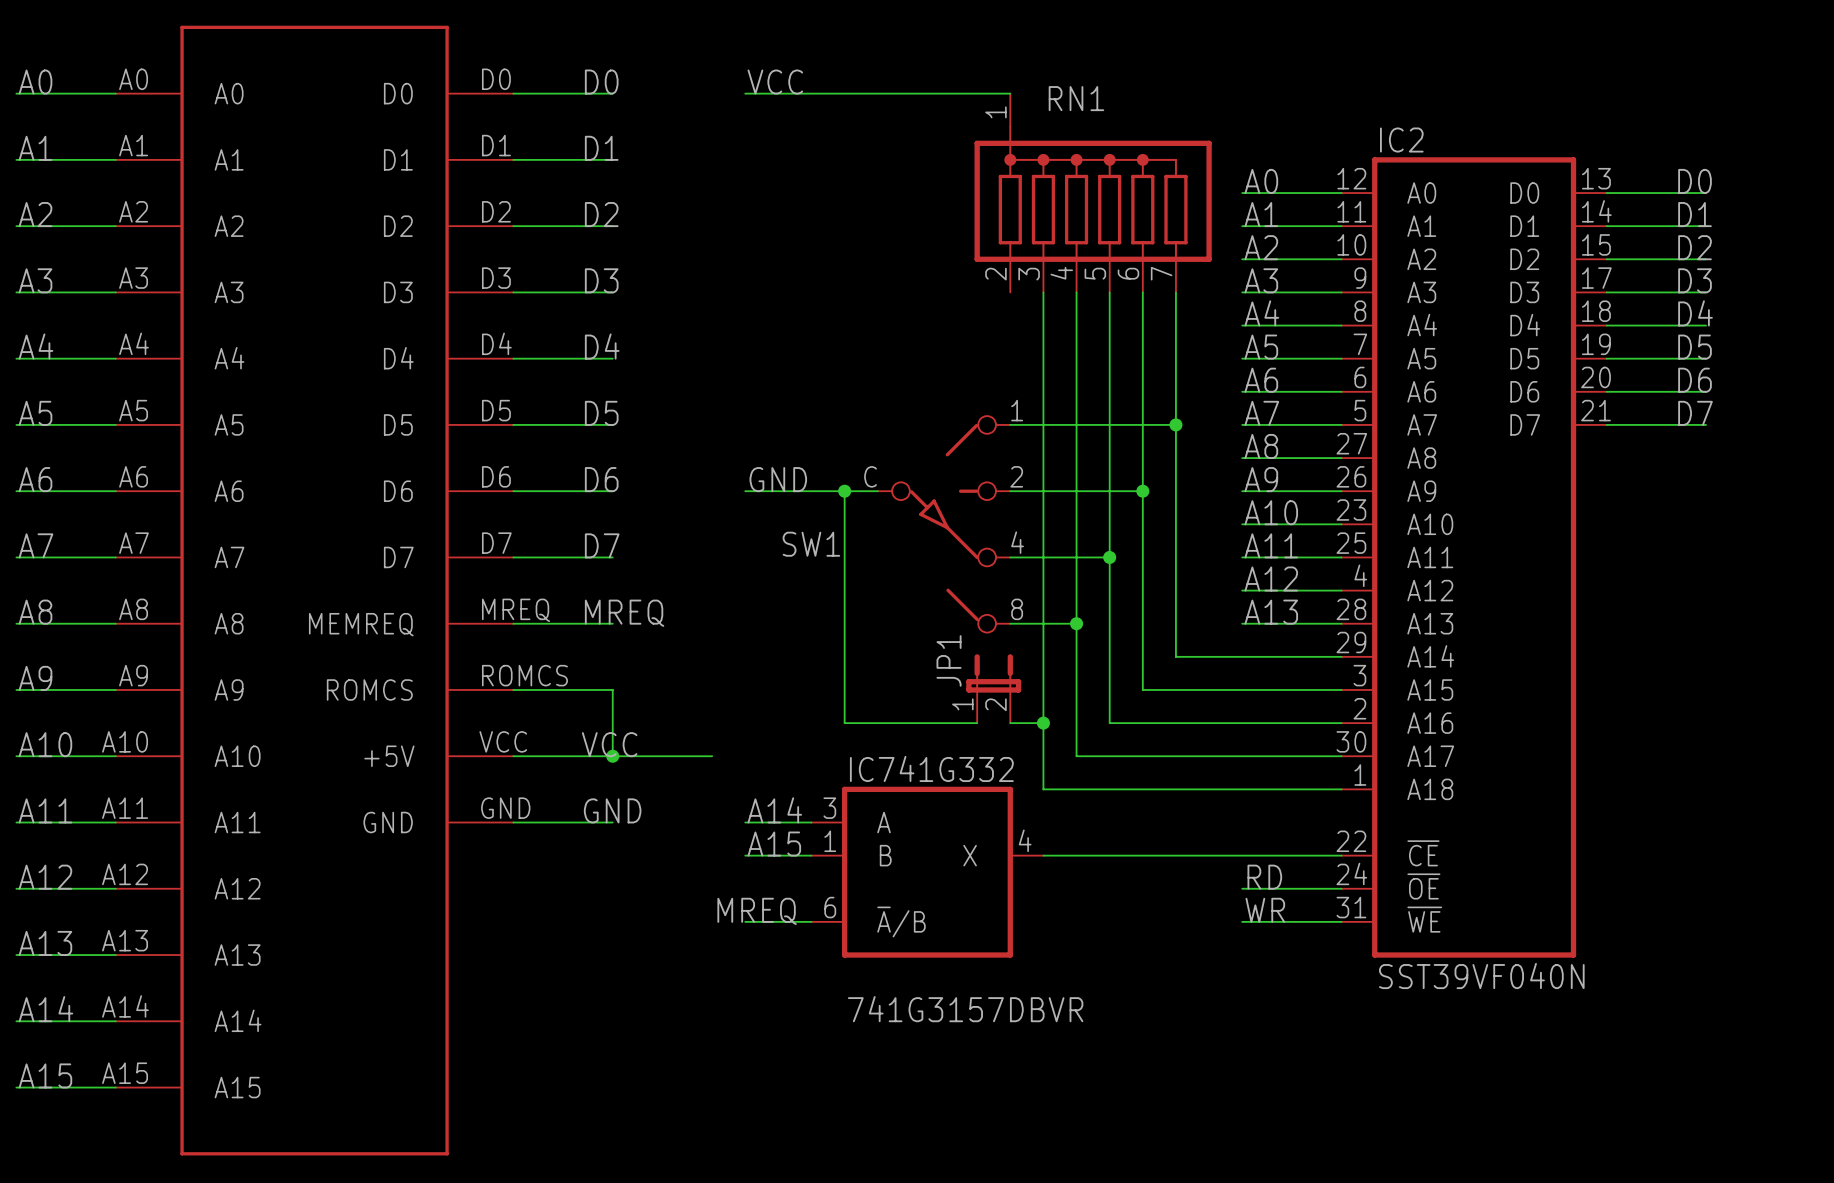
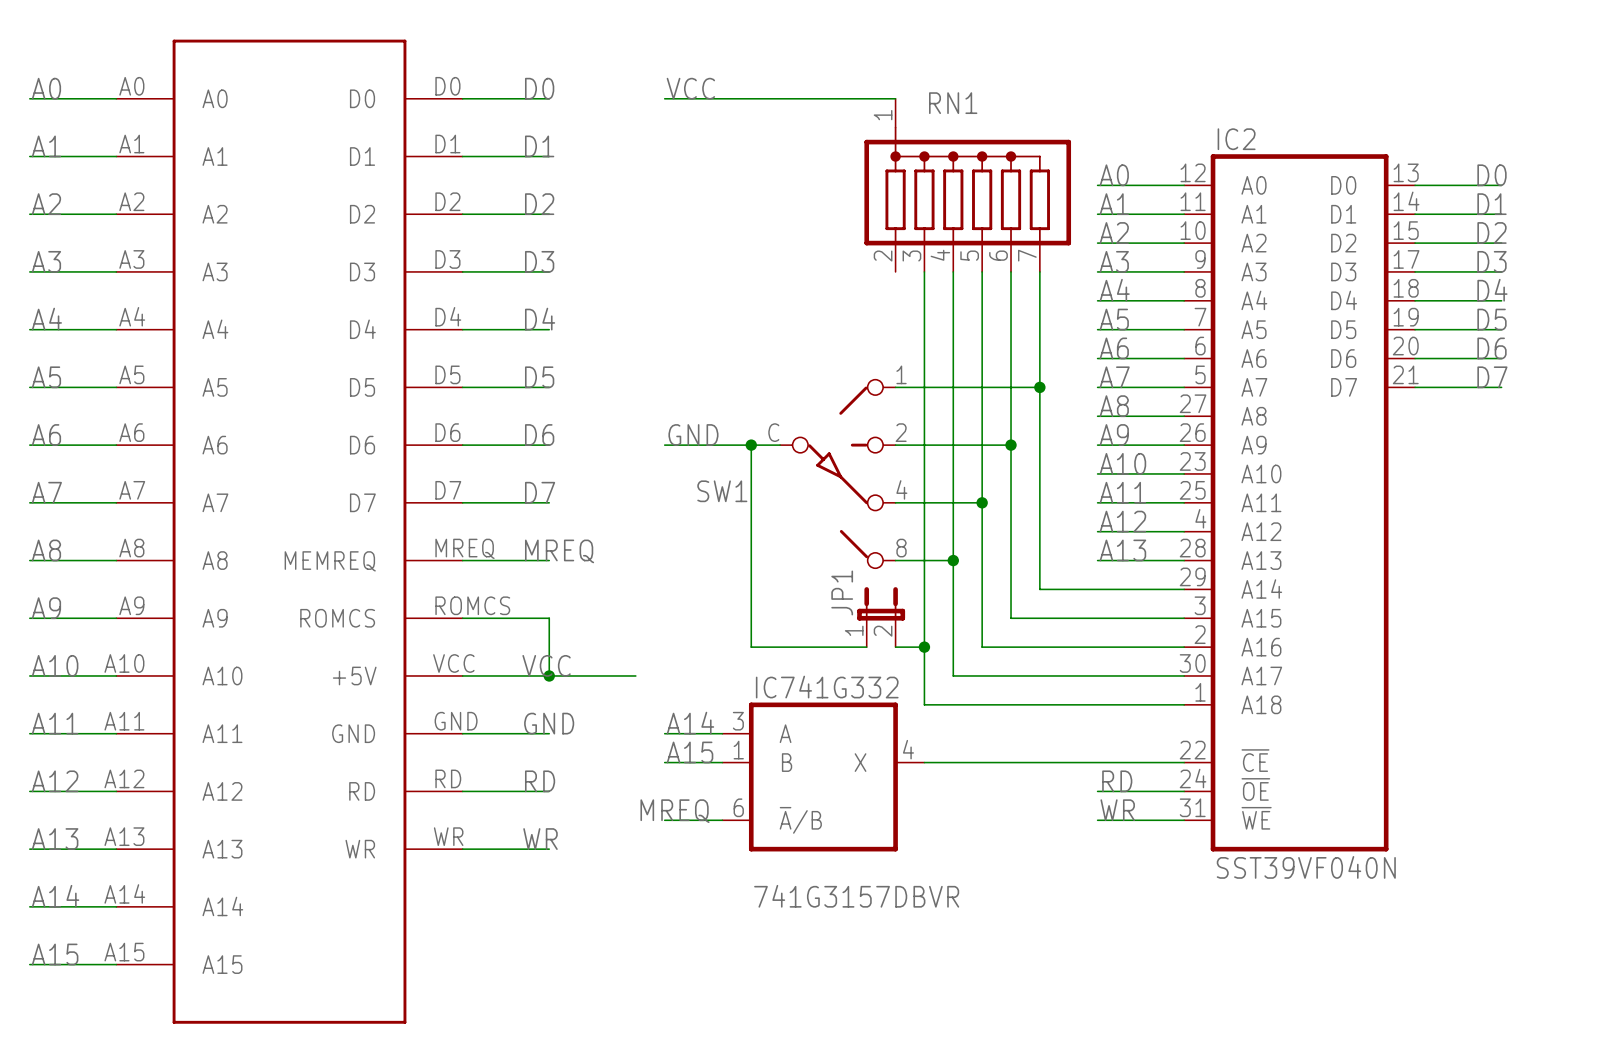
part symbol: [115, 25, 514, 1156] -> [116, 39, 463, 1024]
label: none -> RD (540, 781)
wire: none -> (462, 791) (549, 791)
label: none -> WR (540, 839)
wire: none -> (462, 849) (549, 849)

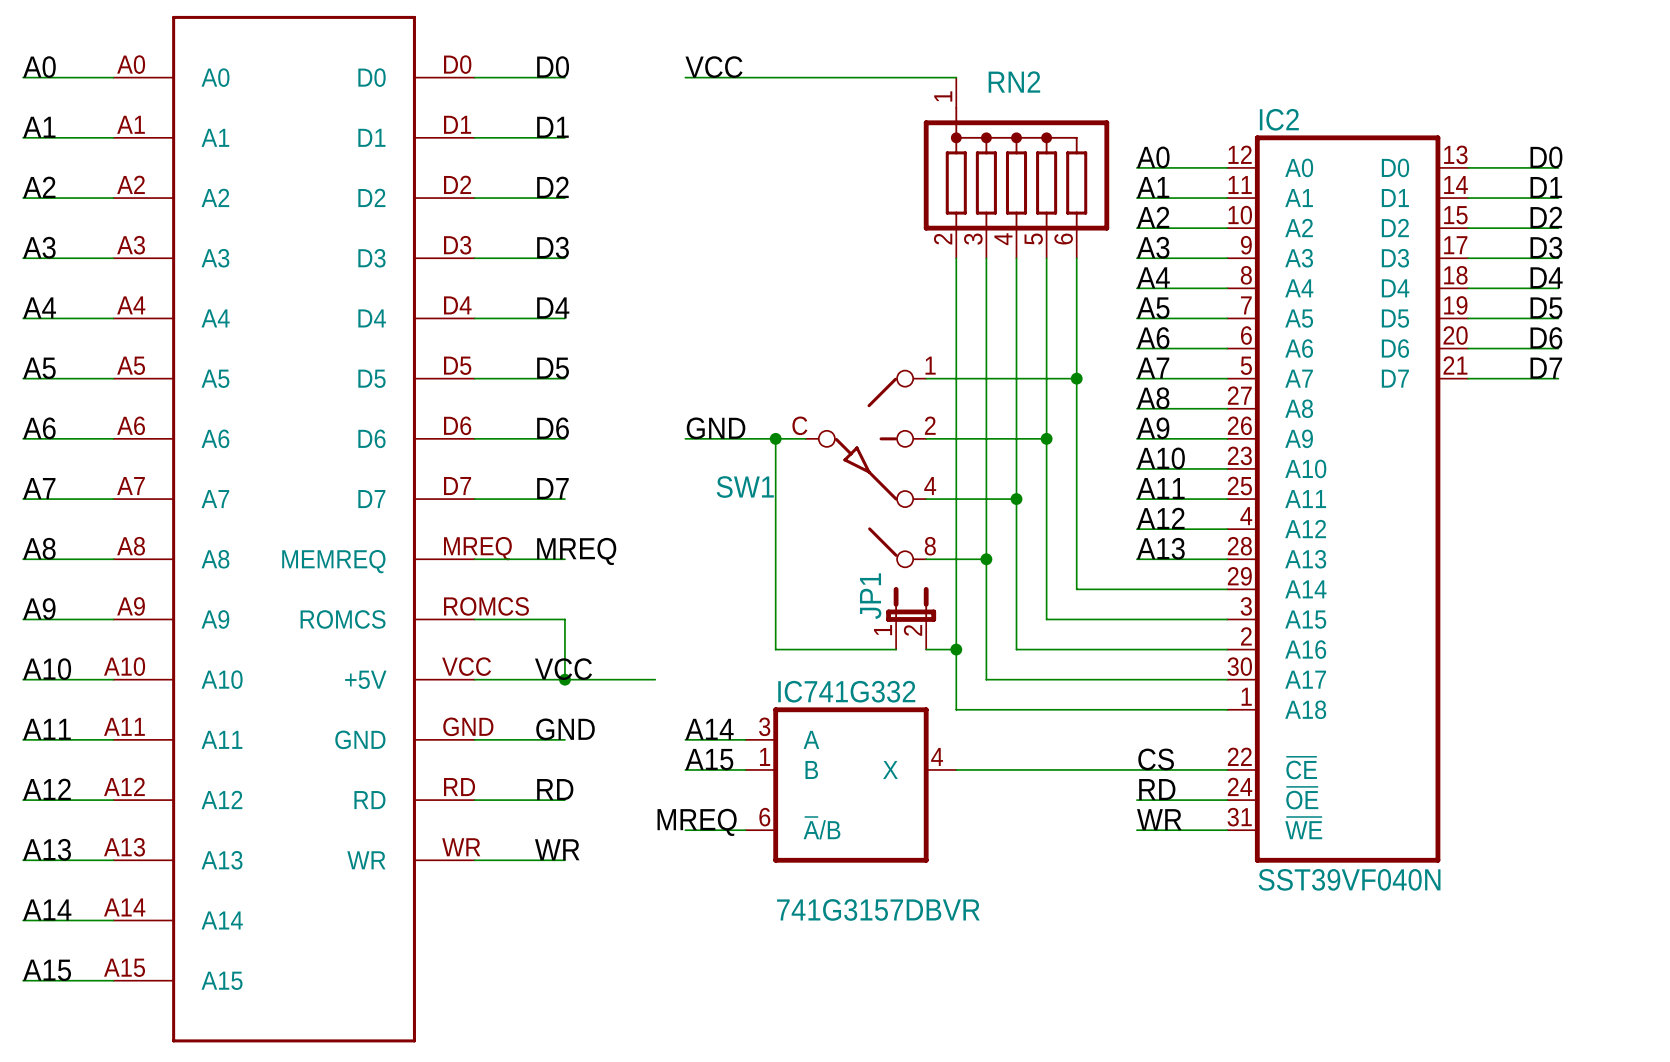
wire: none -> (926, 77) (956, 77)
RN1: (967, 185) -> none
RN2: none -> (1016, 167)
label: none -> CS (1156, 759)

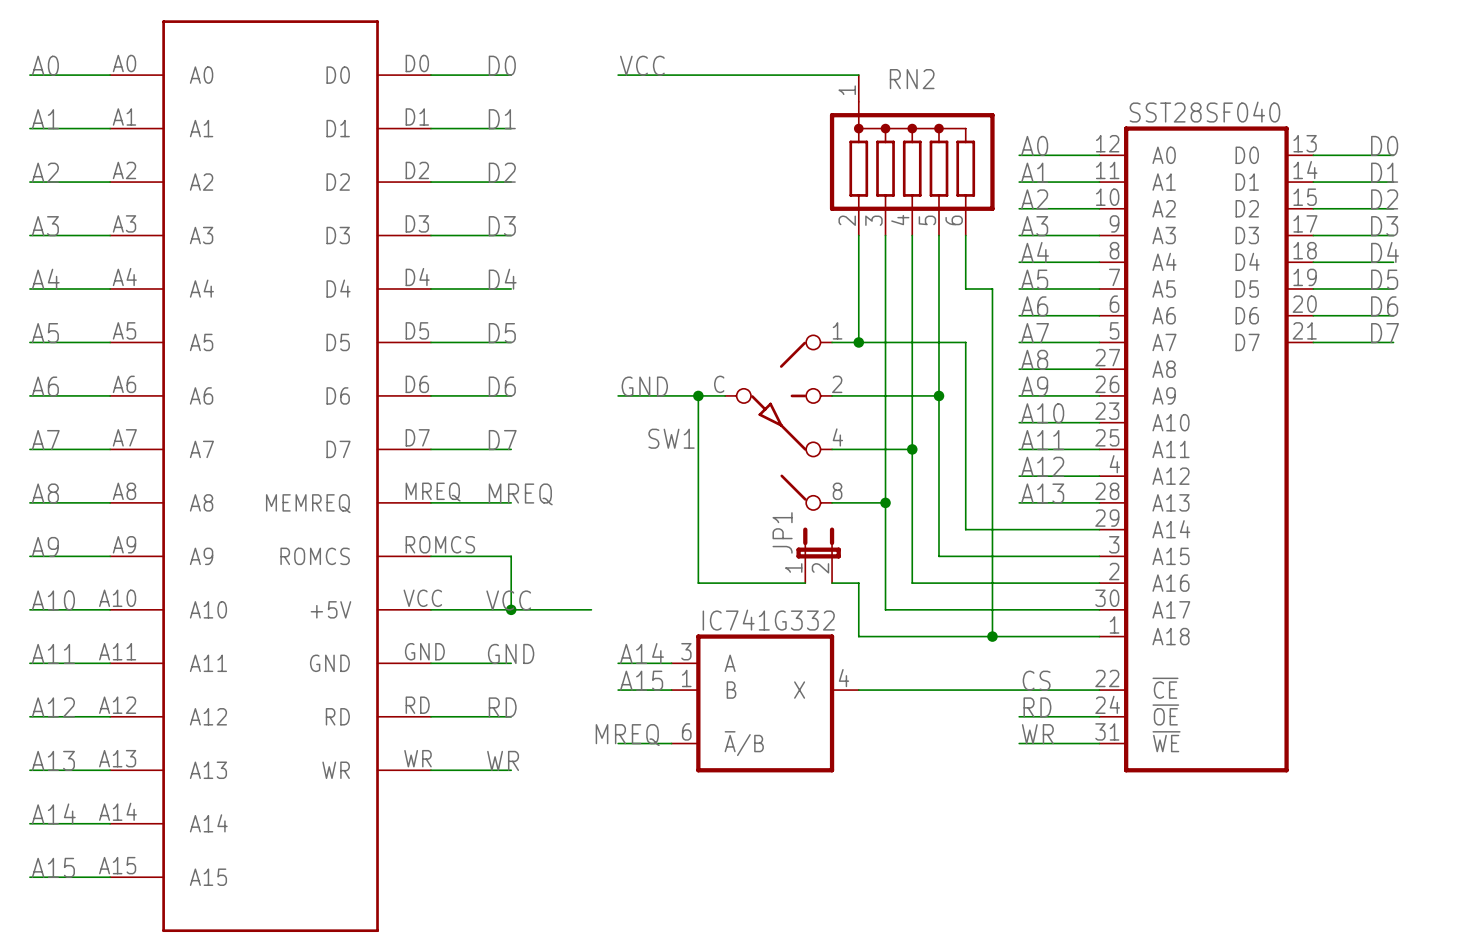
IC2 name: IC2 (1279, 119) -> SST28SF040 (1204, 112)
wire: (1076, 318) (1076, 378) -> (965, 288) (992, 288) (992, 636)
wire: (956, 378) (956, 649) -> none
junction: none -> (858, 342)
junction: (1076, 378) -> none
junction: (956, 649) -> none
junction: none -> (992, 636)
IC2 value: SST39VF040N (1349, 879) -> none
IC741G332 value: 741G3157DBVR (878, 909) -> none

